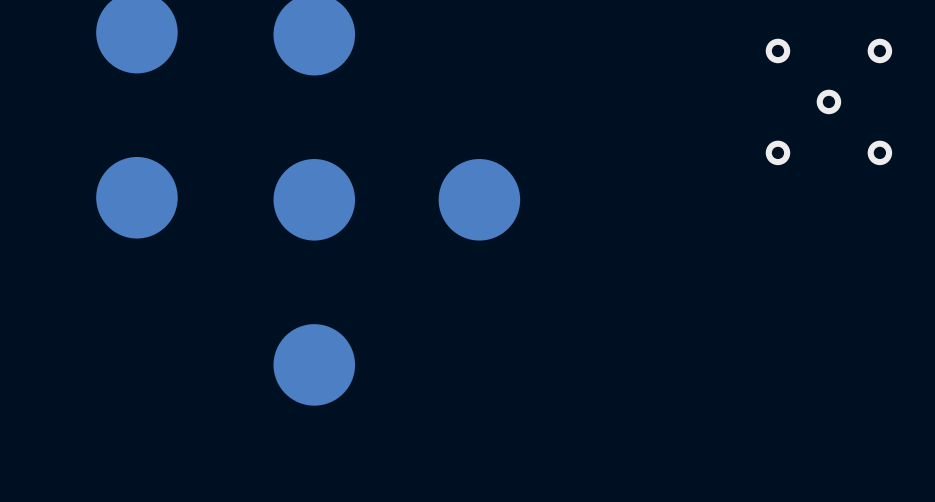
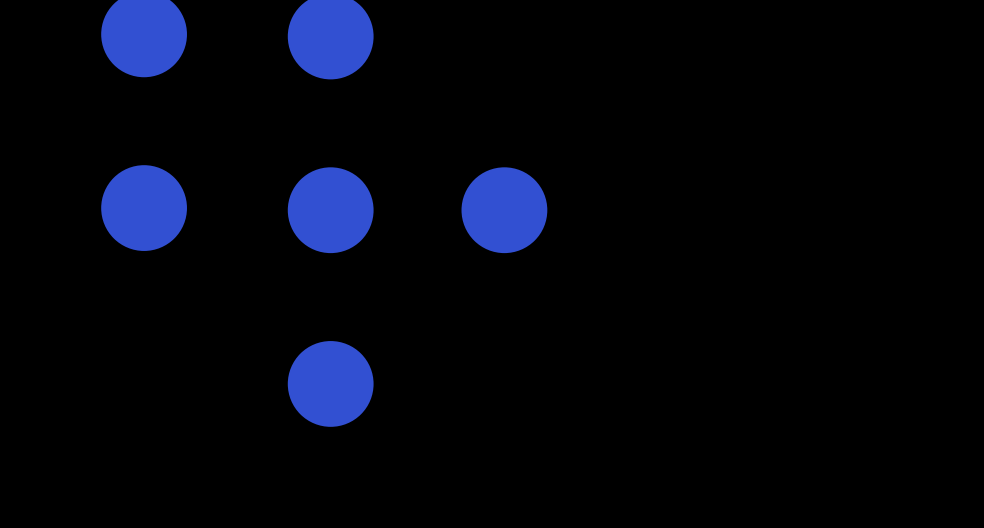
via: (777, 50) -> none
via: (879, 50) -> none
via: (828, 101) -> none
via: (777, 152) -> none
via: (879, 152) -> none

